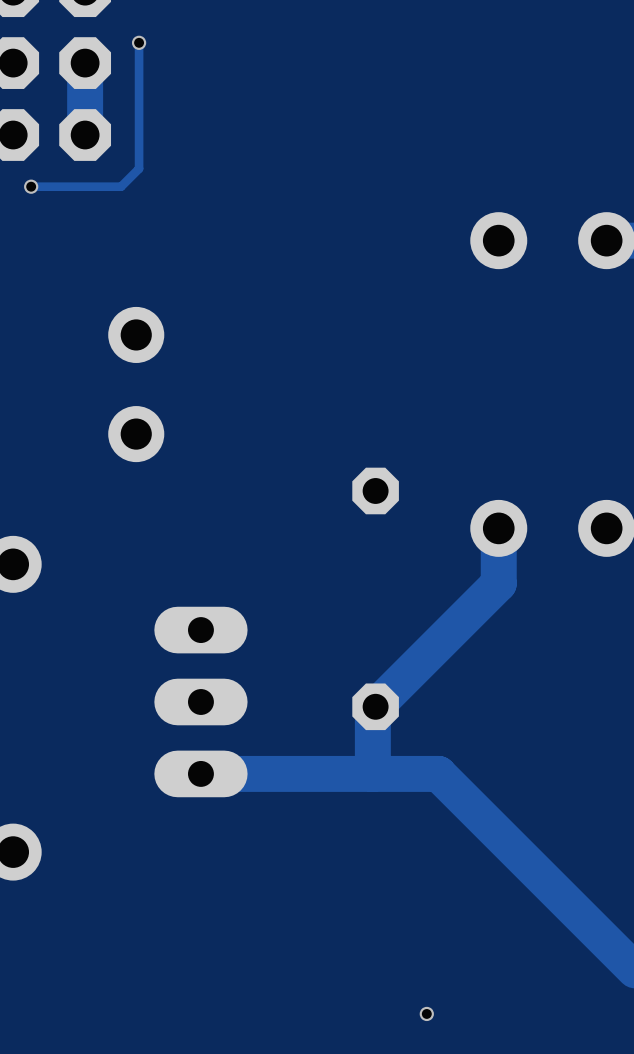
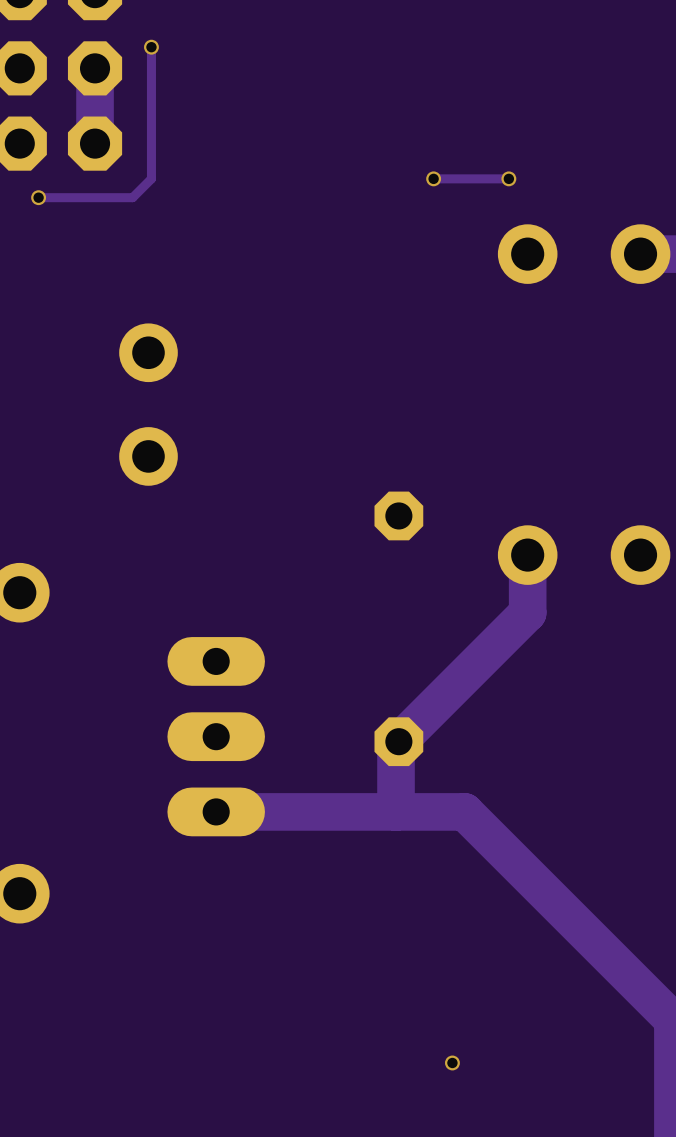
via: none -> (433, 178)
track: none -> (508, 178) (433, 178)
via: none -> (508, 178)

